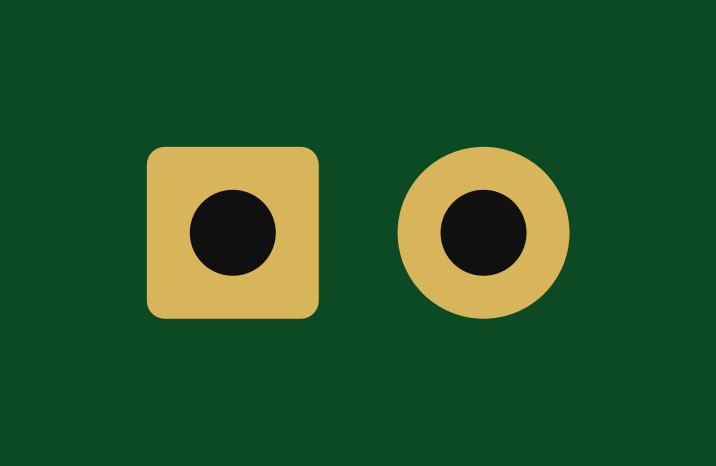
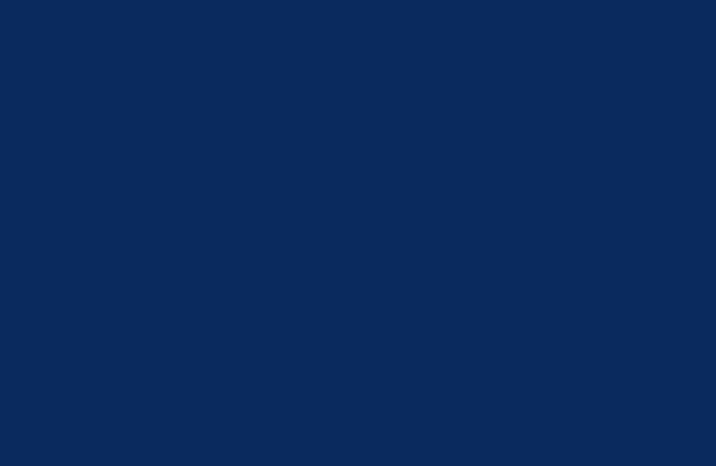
part: (358, 232) -> none

